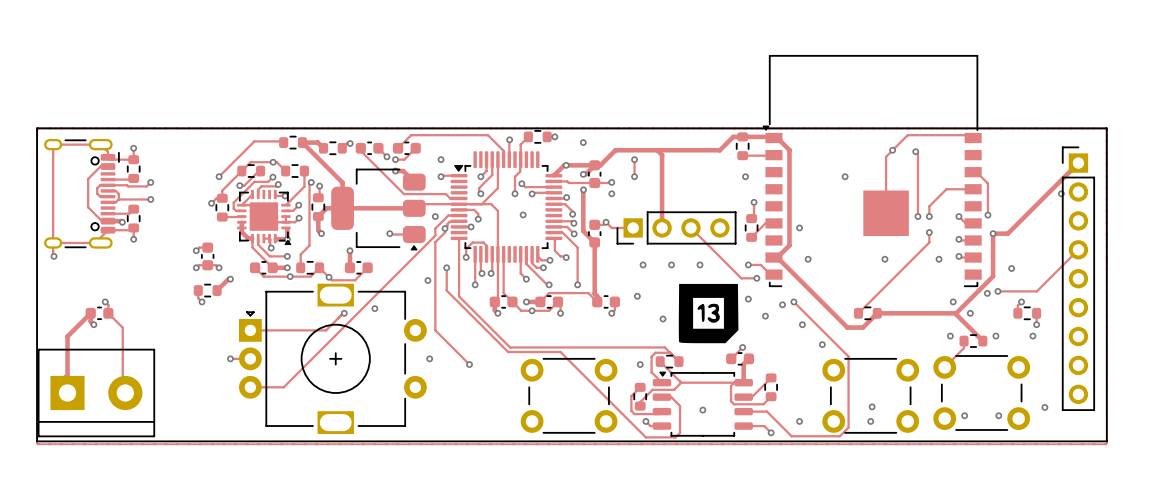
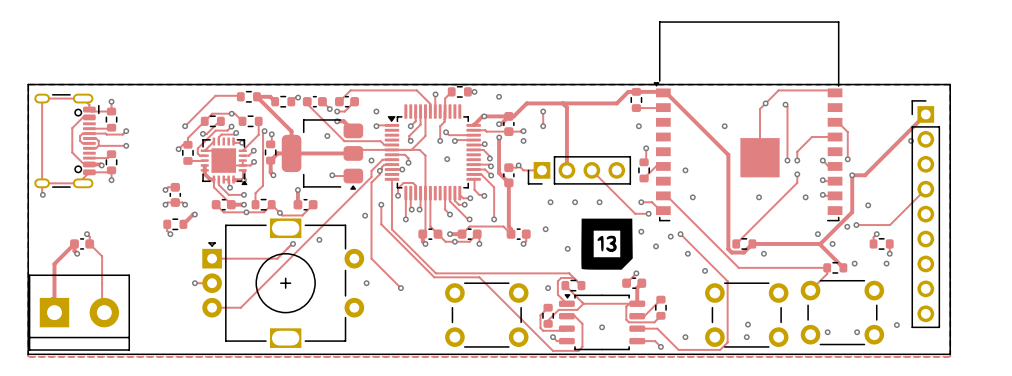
track: (789, 150) (789, 245) (777, 257) (847, 327) (863, 327) (867, 323) -> (676, 103) (728, 154) (728, 249) (731, 252) (743, 252)
via: none -> (327, 136)
track: none -> (666, 195) (738, 267) (827, 267)
via position: (950, 336) -> (763, 253)

